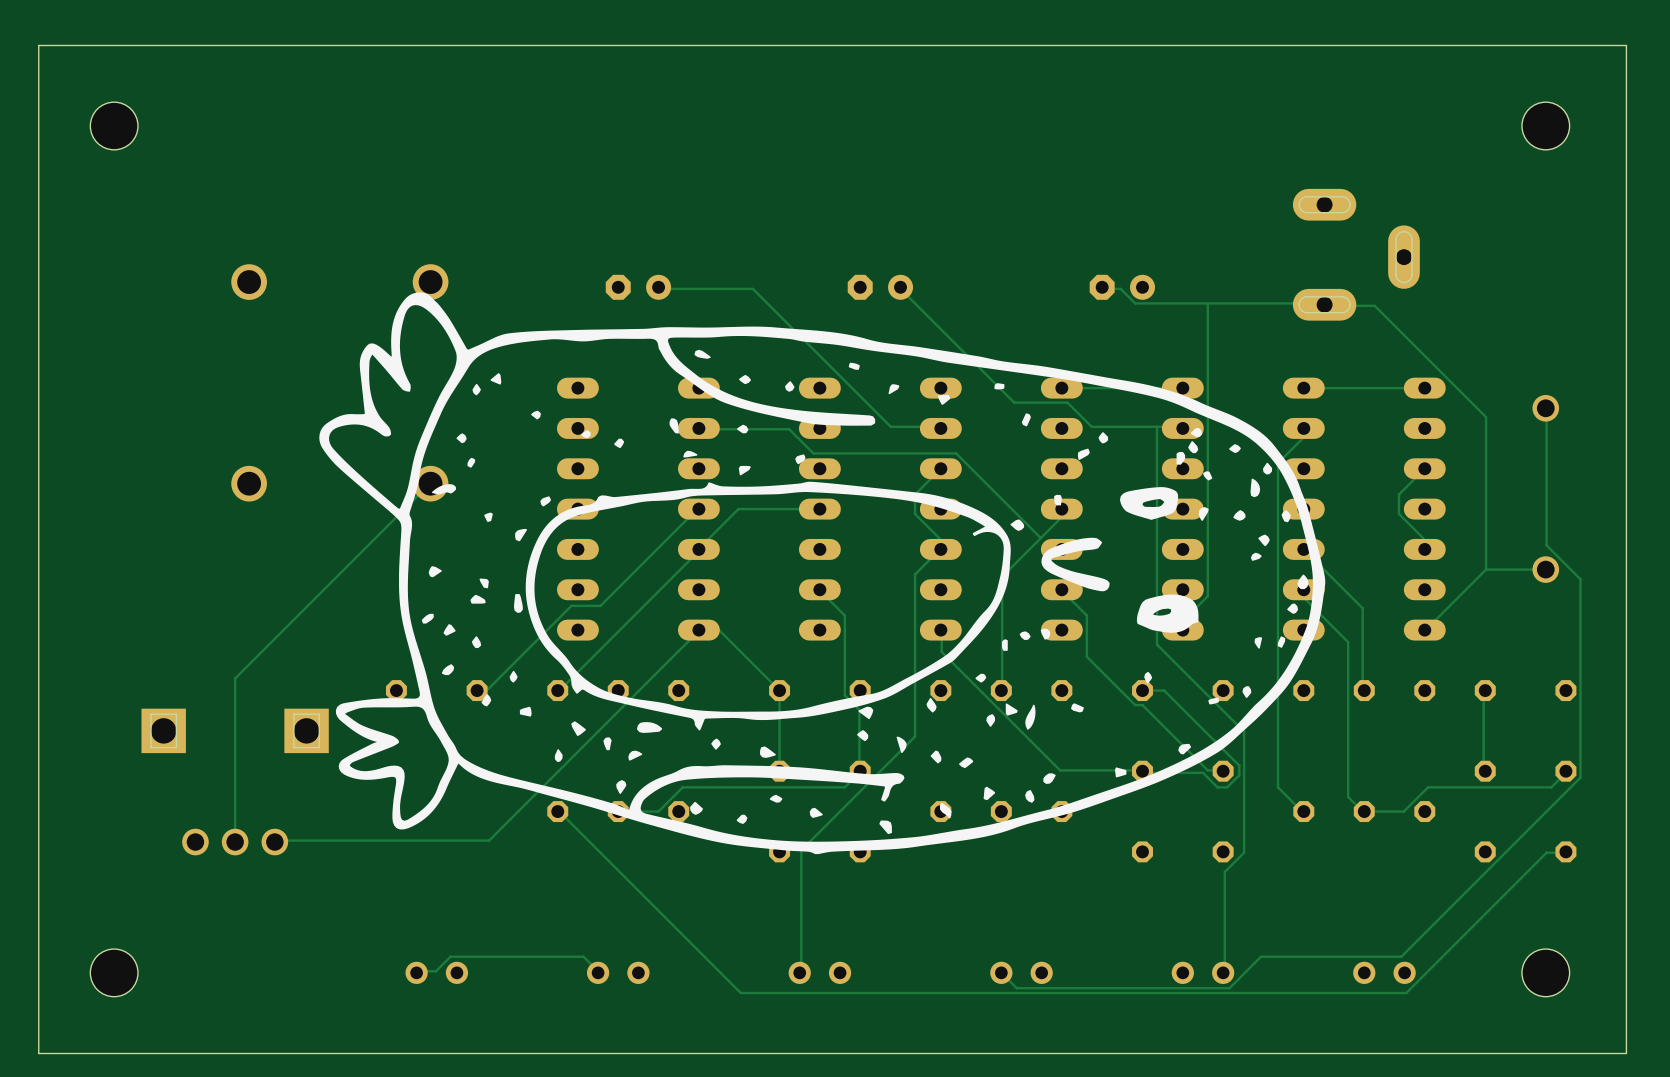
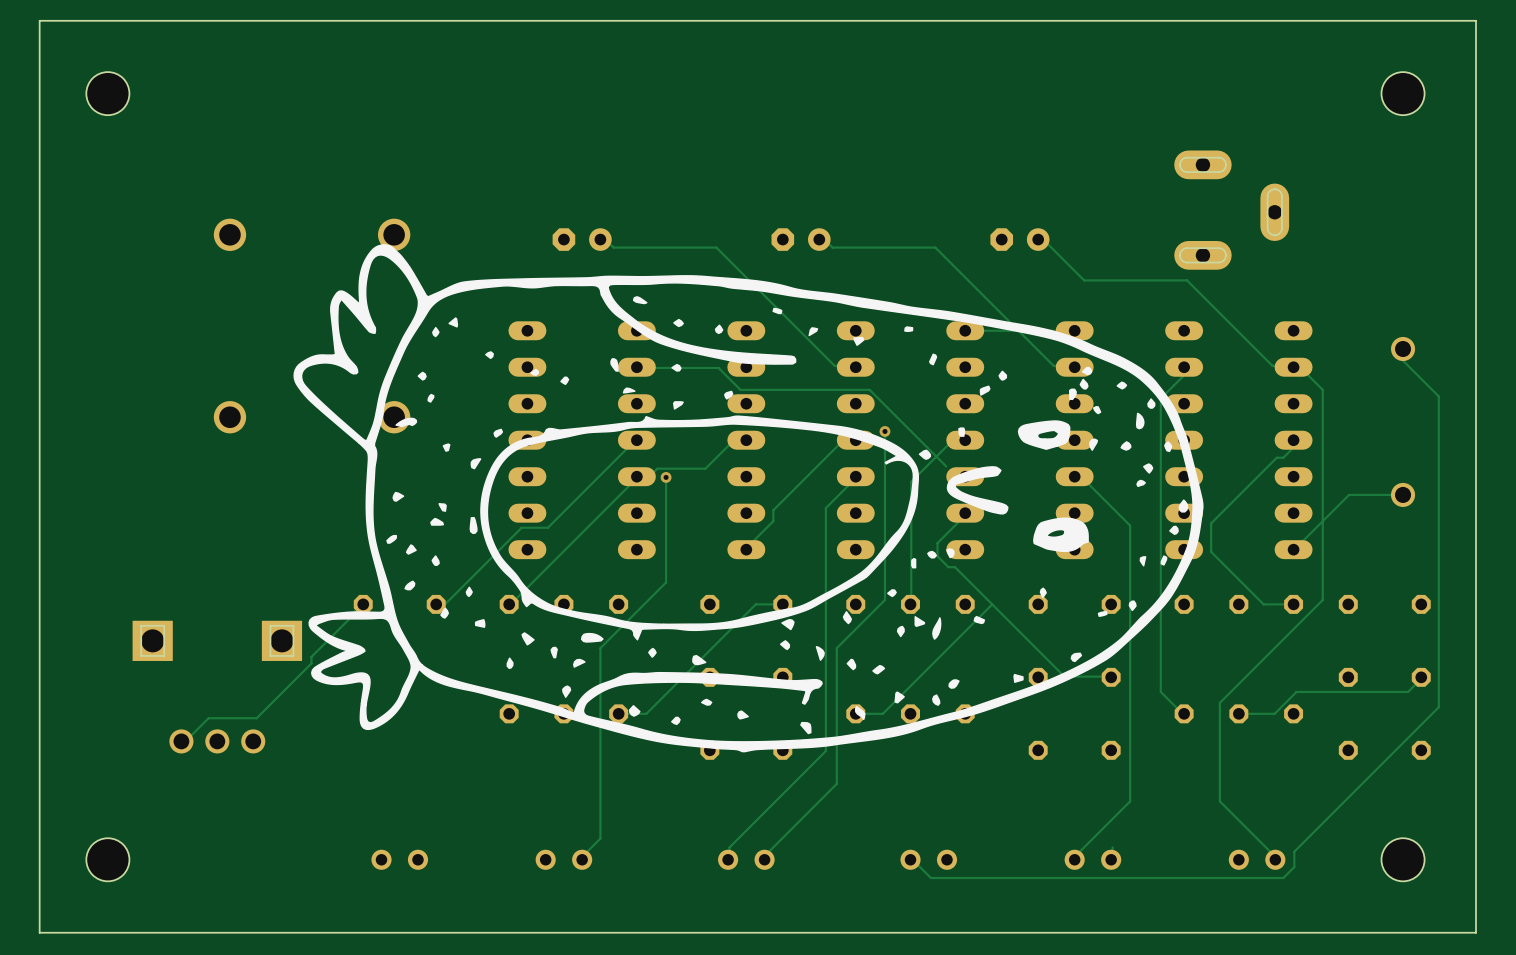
track: (1102, 287) (1120, 288) (1135, 303) (1323, 303) (1326, 305) (1374, 305) (1486, 417) (1486, 569) -> none
track: none -> (1038, 239) (1044, 241) (1084, 280) (1187, 280) (1272, 365) (1292, 365) (1294, 367) (1300, 367) (1322, 389) (1322, 600) (1219, 702) (1219, 801) (1270, 851) (1275, 859)
track: (665, 288) (752, 288) (890, 426) (917, 426) -> (606, 241) (613, 247) (716, 247) (834, 365)
track: (900, 288) (1014, 402) (1067, 402) (1091, 426) (1159, 426) -> (819, 241) (825, 241) (832, 247) (935, 247) (1053, 365)
track: (1207, 303) (1207, 596) (1183, 620) (1182, 630) -> none
track: (1424, 388) (1303, 388) -> none
track: (1546, 421) (1546, 545) (1580, 579) (1580, 777) (1401, 956) (1261, 956) (1229, 988) (1016, 988) (1001, 972) -> (1403, 361) (1438, 396) (1438, 707) (1294, 851) (1294, 867) (1283, 878) (1276, 878)
track: (1157, 426) (1157, 644) (1244, 731) -> (1074, 476) (1081, 477) (1130, 525) (1130, 641)
track: (940, 468) (915, 494) (915, 513) (939, 538) (940, 549) (915, 574) (915, 736) (801, 850) (801, 959) -> (855, 476) (825, 508) (825, 751) (729, 847)
track: (1424, 468) (1398, 494) (1398, 513) (1423, 538) (1424, 549) -> none
track: (430, 483) (235, 678) (235, 842) -> none
track: none -> (884, 431) (884, 600) (836, 648) (836, 783) (768, 851) (764, 859)
via: none -> (884, 431)
track: (806, 509) (738, 509) (699, 547) -> (733, 440) (705, 468) (657, 468) (650, 475) (637, 475)
track: none -> (855, 440) (843, 440) (773, 510) (773, 521) (746, 549)
track: (1060, 509) (1060, 518) (1002, 576) -> (963, 440) (952, 440) (911, 481) (911, 501)
track: none -> (1293, 440) (1292, 448) (1283, 457) (1276, 457) (1211, 523) (1211, 551) (1263, 604) (1293, 604)
track: (1303, 549) (1362, 608) (1362, 690) (1364, 690) -> none
track: none -> (666, 477) (666, 582) (600, 648) (600, 838) (582, 859)
via: none -> (666, 477)
track: (819, 589) (844, 615) (844, 695) (859, 709) (859, 772) (844, 787) (682, 787) (658, 811) (618, 811) -> none
track: (1303, 589) (1304, 598) (1348, 642) (1348, 797) (1364, 811) -> none
track: (1062, 591) (1086, 615) (1086, 656) (1135, 705) (1142, 705) (1207, 770) -> (965, 514) (937, 543) (937, 556) (948, 567) (955, 567) (1064, 676) (1097, 676)
track: (698, 630) (719, 630) (779, 690) (779, 771) -> none
track: (699, 630) (489, 840) (274, 842) -> none
track: (940, 630) (941, 651) (1060, 770) (1202, 772) (1217, 787) (1227, 787) (1239, 775) (1239, 765) (1164, 690) (1142, 690) -> none
track: none -> (363, 604) (311, 656) (311, 663) (256, 718) (208, 718) (186, 740) (181, 741)
track: none -> (782, 604) (755, 604) (646, 713) (618, 713)
track: none -> (992, 604) (882, 713) (855, 713)
track: (1485, 690) (1483, 690) (1483, 770) (1485, 771) -> none
track: (557, 811) (740, 993) (1023, 993) -> (910, 859) (911, 858) (930, 878)
track: (1565, 851) (1546, 852) (1406, 993) -> none
track: (1244, 852) (1224, 872) (1224, 959) -> (1130, 751) (1130, 801) (1079, 851) (1074, 859)
track: (598, 972) (583, 956) (450, 956) (435, 971) (416, 971) (416, 972) -> none

